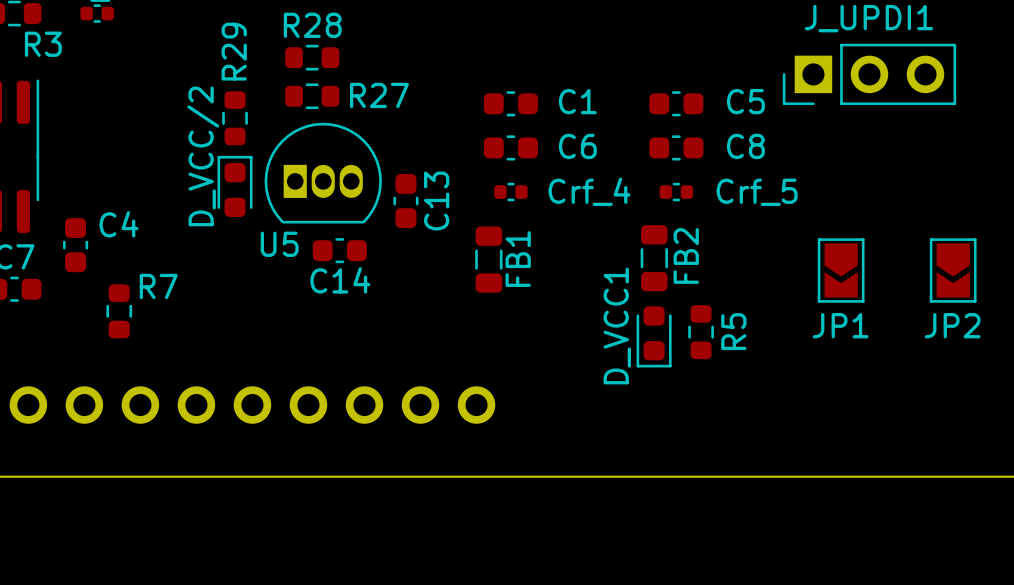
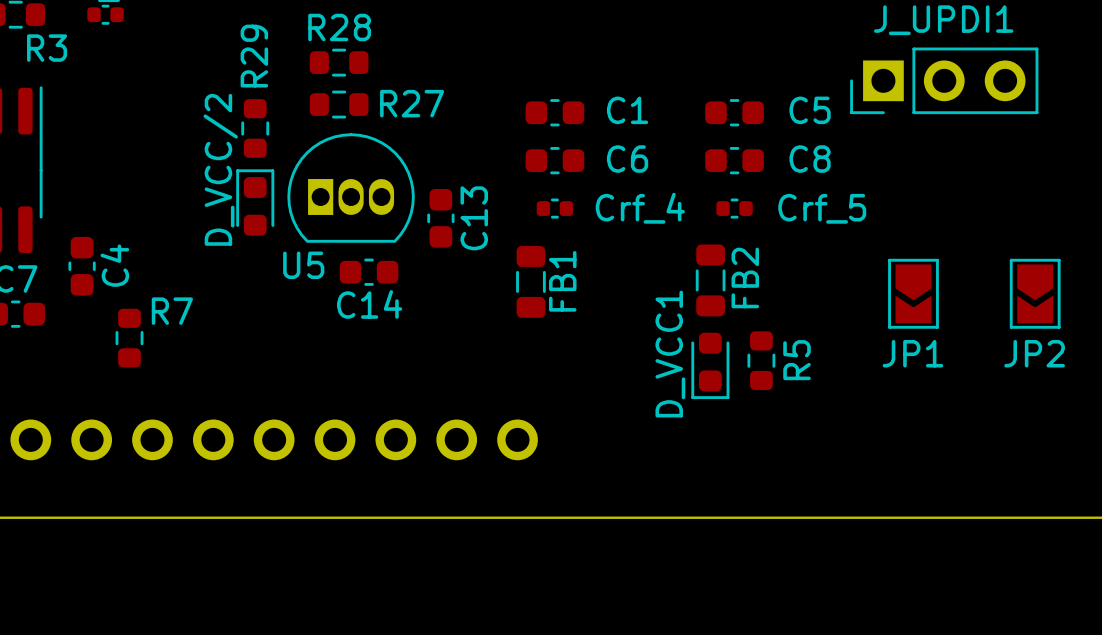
C4 name rotation: 0° (118, 224) -> 90° counterclockwise (114, 265)

